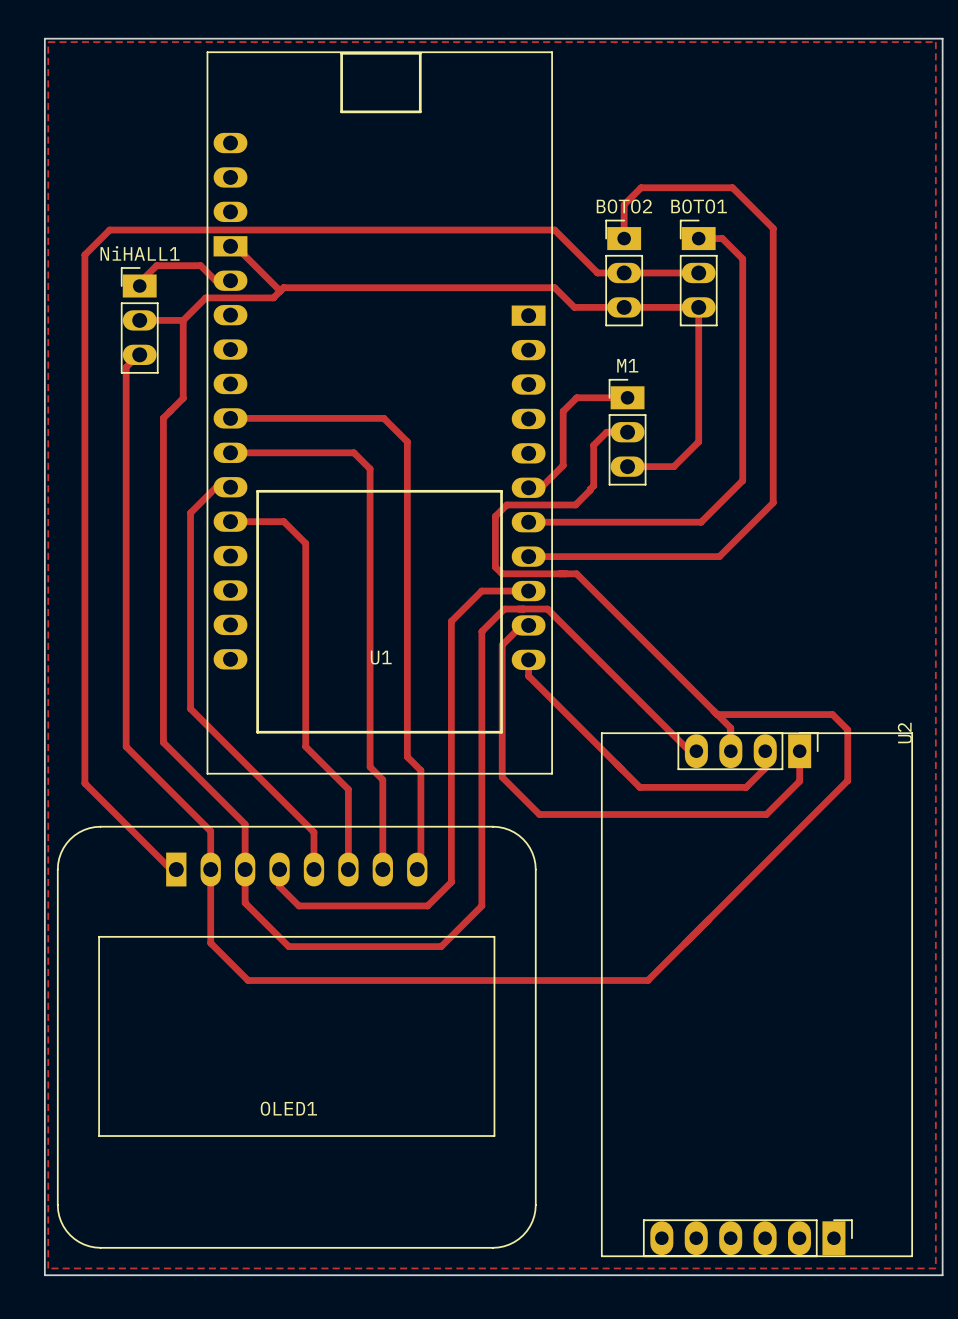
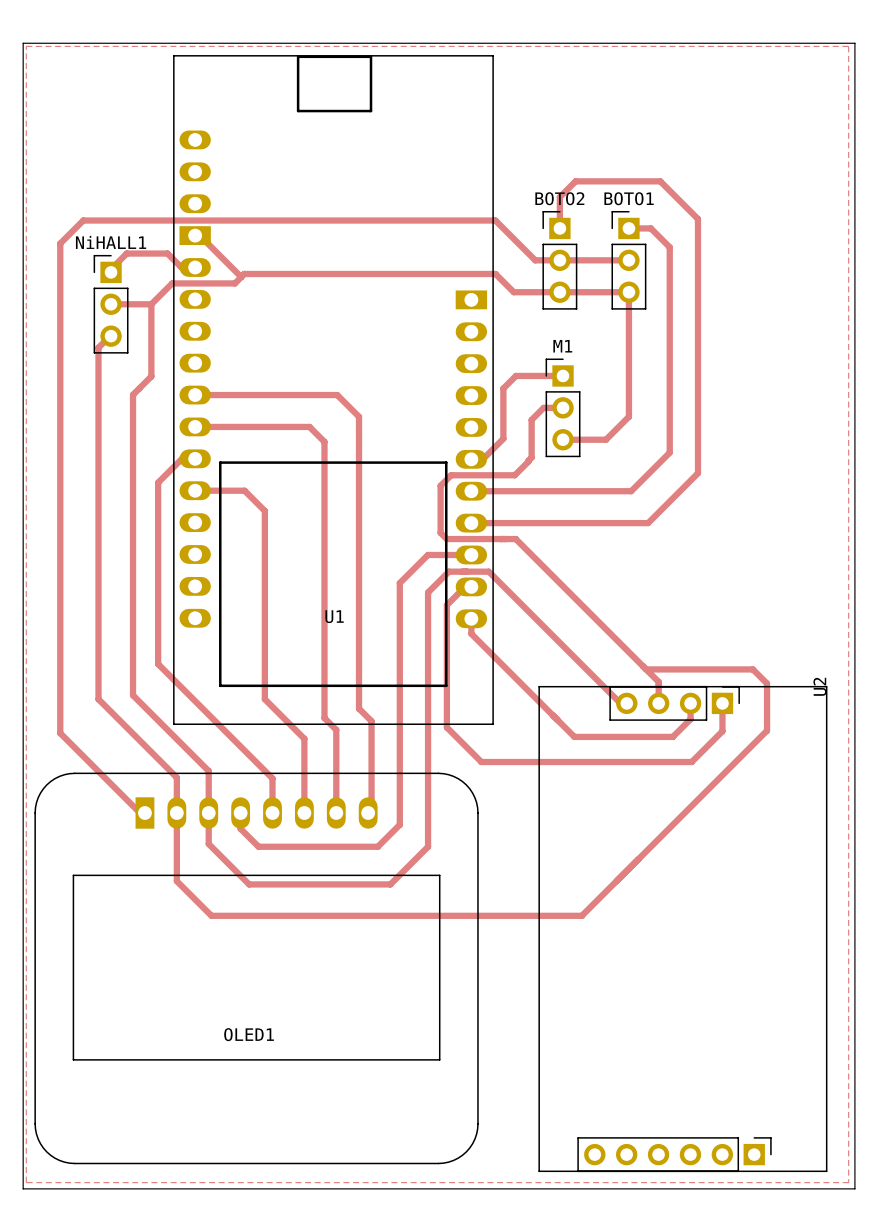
BOTO2 footprint: [605, 219, 644, 327] -> [542, 210, 578, 310]
BOTO1 footprint: [679, 219, 718, 327] -> [611, 210, 647, 310]
NiHALL1 footprint: [120, 267, 159, 374] -> [93, 254, 129, 354]
M1 footprint: [608, 378, 647, 486] -> [545, 358, 581, 458]
U2 footprint: [601, 732, 913, 1258] -> [538, 685, 828, 1173]

